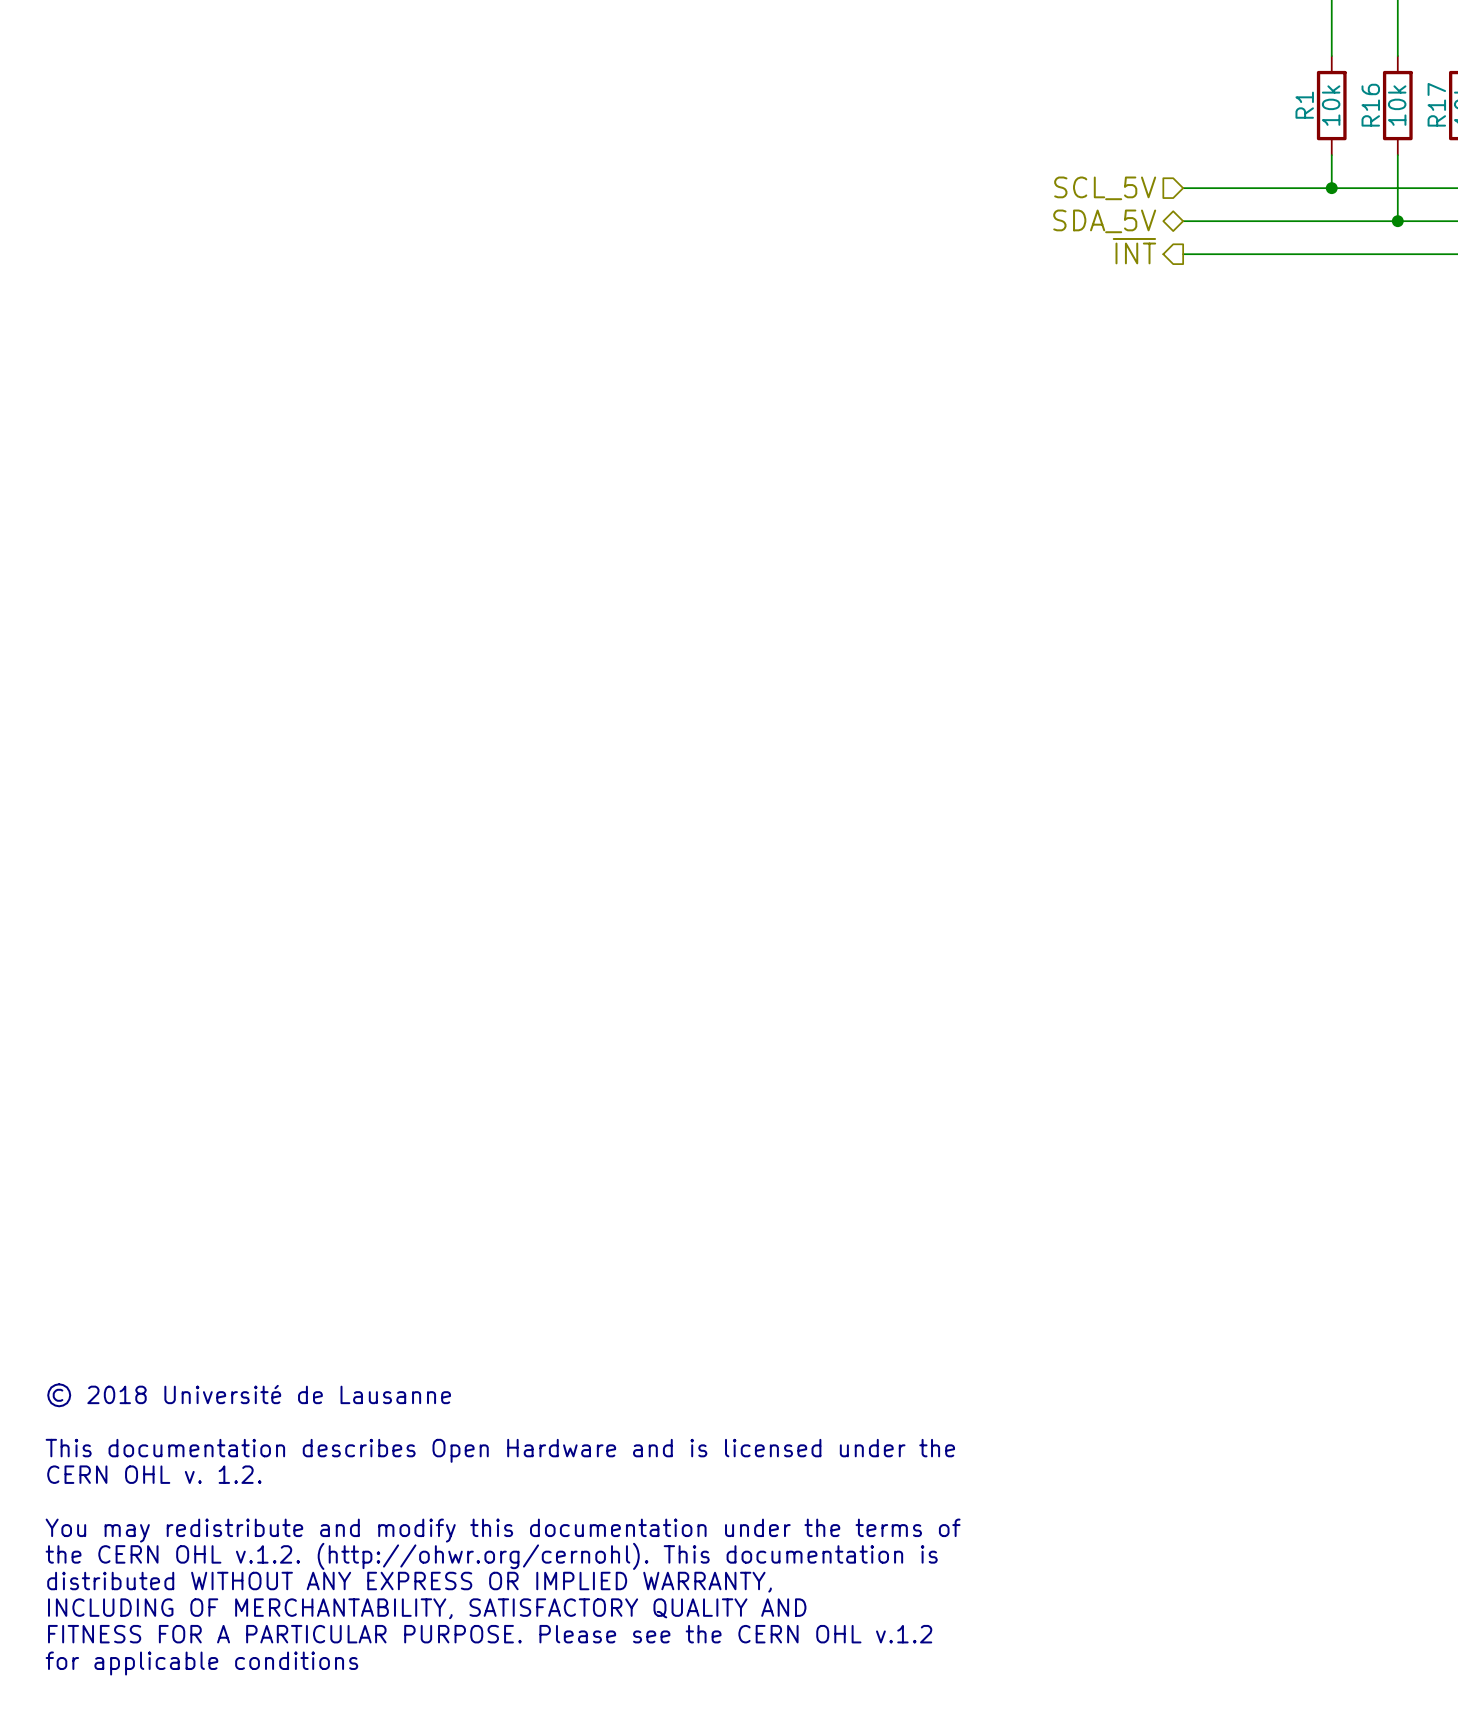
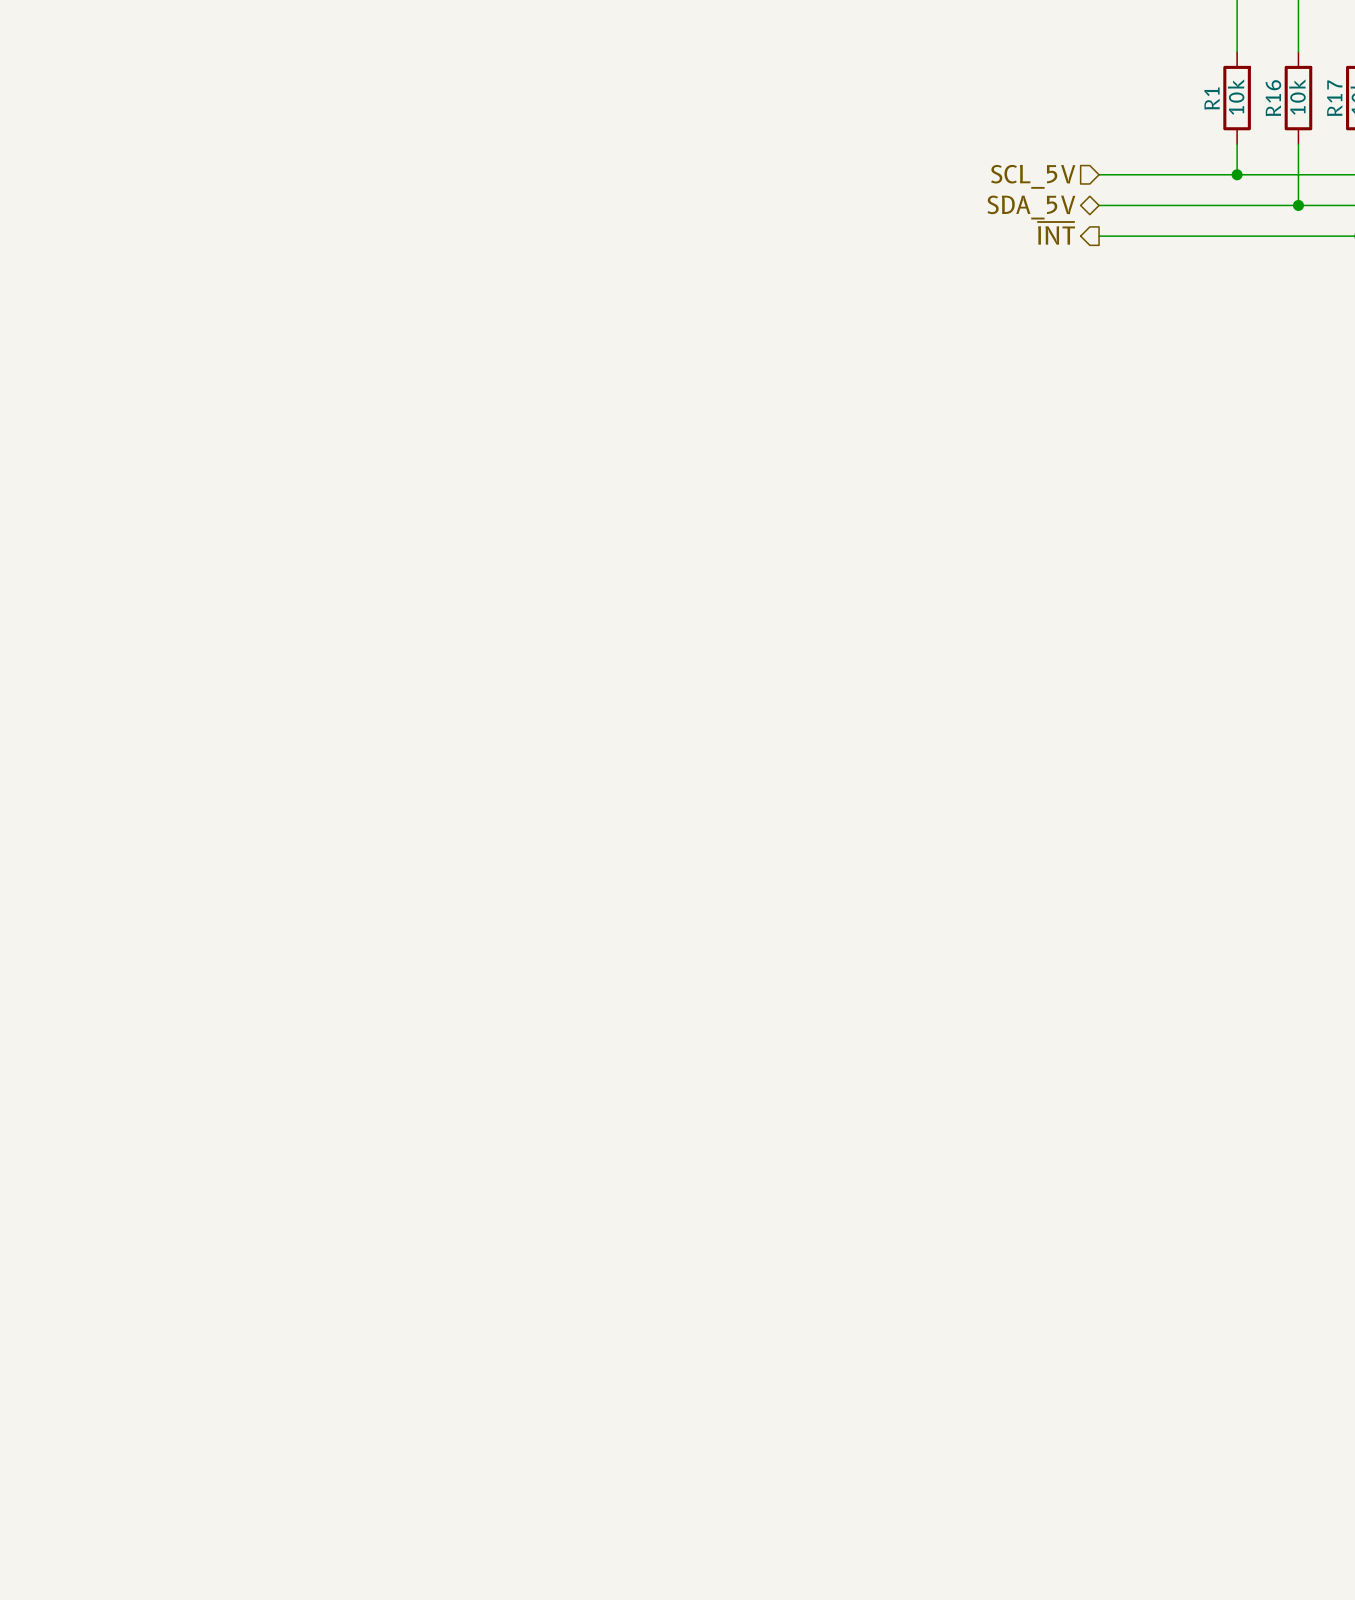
text: © 2018 Université de Lausanne (249, 1395) -> none
text: This documentation describes Open Hardware and is licensed under the (500, 1450) -> none
text: CERN OHL v. 1.2. (154, 1474) -> none
text: You may redistribute and modify this documentation under the terms of (503, 1530) -> none
text: the CERN OHL v.1.2. (http://ohwr.org/cernohl). This documentation is (491, 1556) -> none
text: distributed WITHOUT ANY EXPRESS OR IMPLIED WARRANTY, (409, 1582) -> none
text: INCLUDING OF MERCHANTABILITY, SATISFACTORY QUALITY AND (427, 1608) -> none
text: FITNESS FOR A PARTICULAR PURPOSE. Please see the CERN OHL v.1.2 (490, 1634) -> none
text: for applicable conditions (201, 1663) -> none

